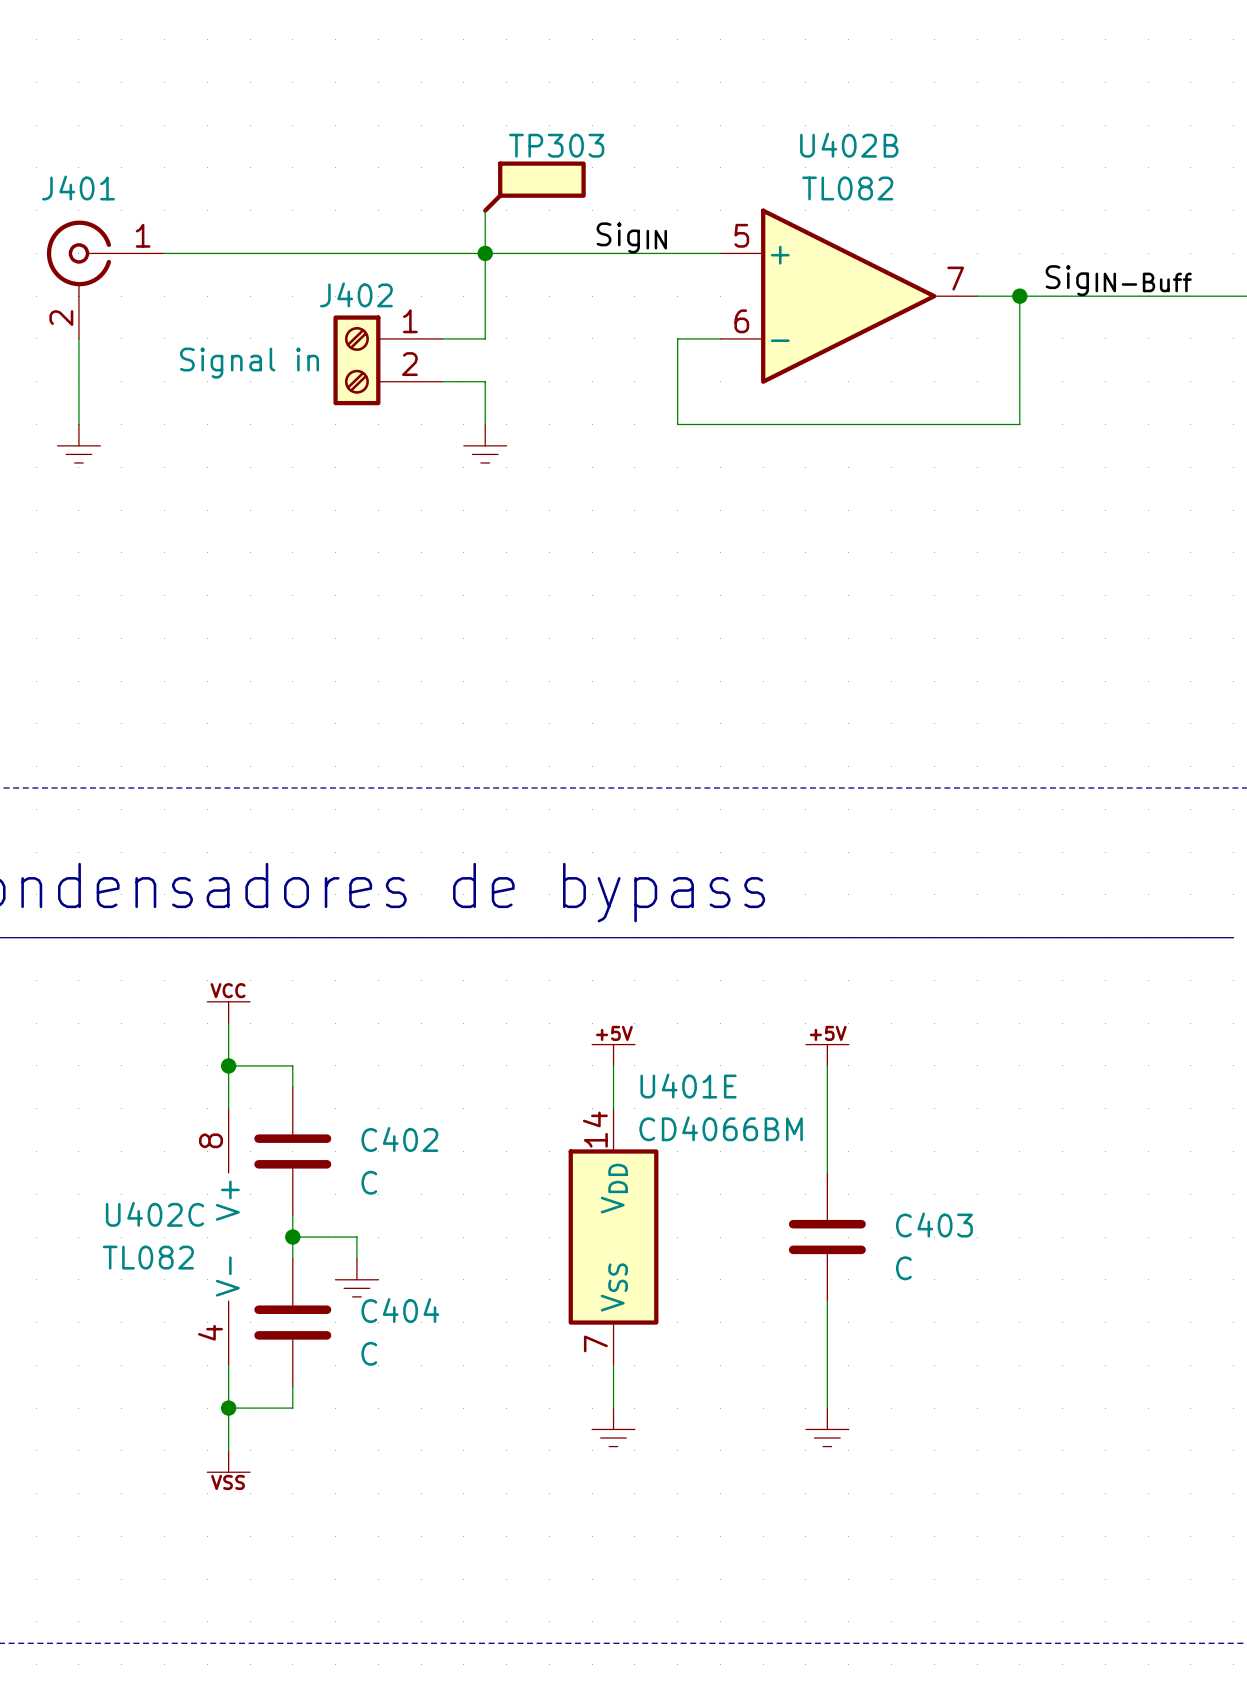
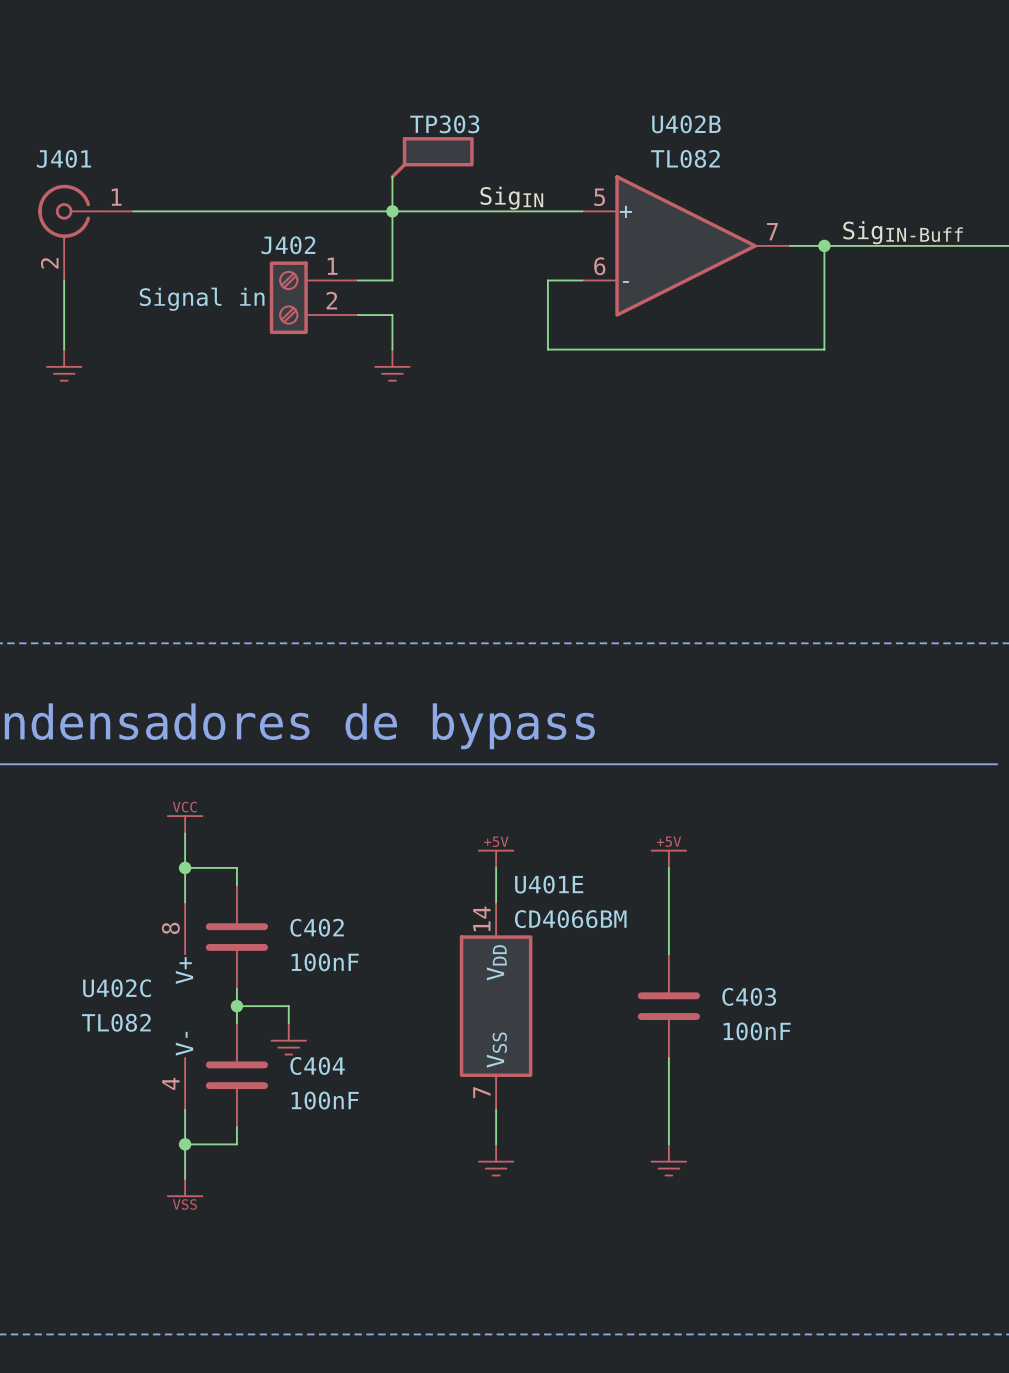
C402 value: C (369, 1182) -> 100nF (325, 962)
C403 value: C (903, 1268) -> 100nF (757, 1031)
C404 value: C (369, 1353) -> 100nF (325, 1100)

